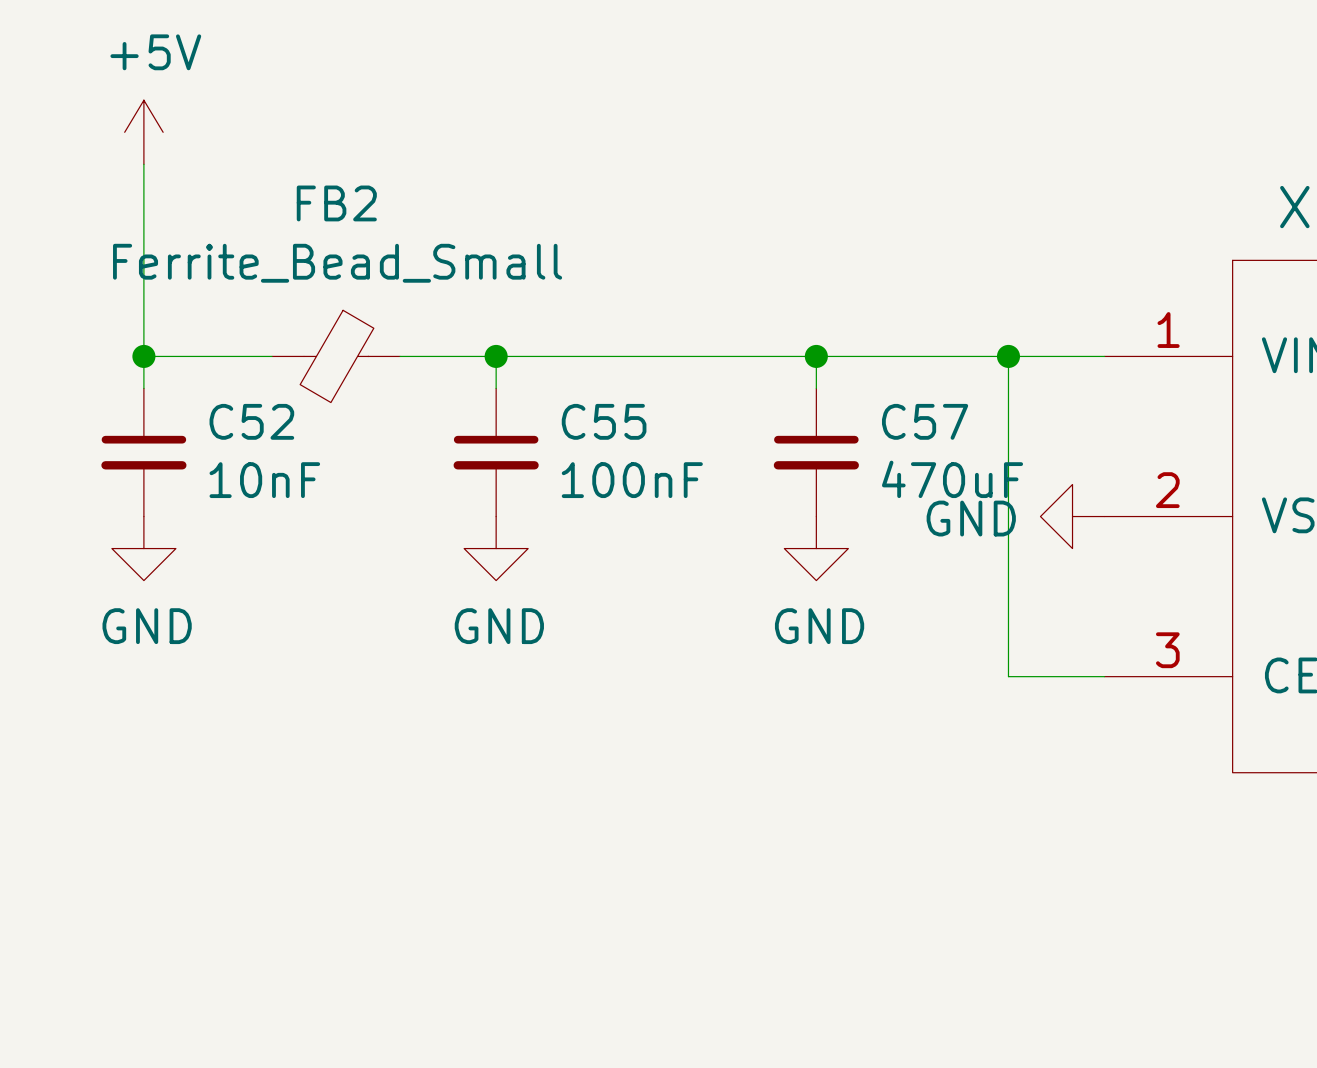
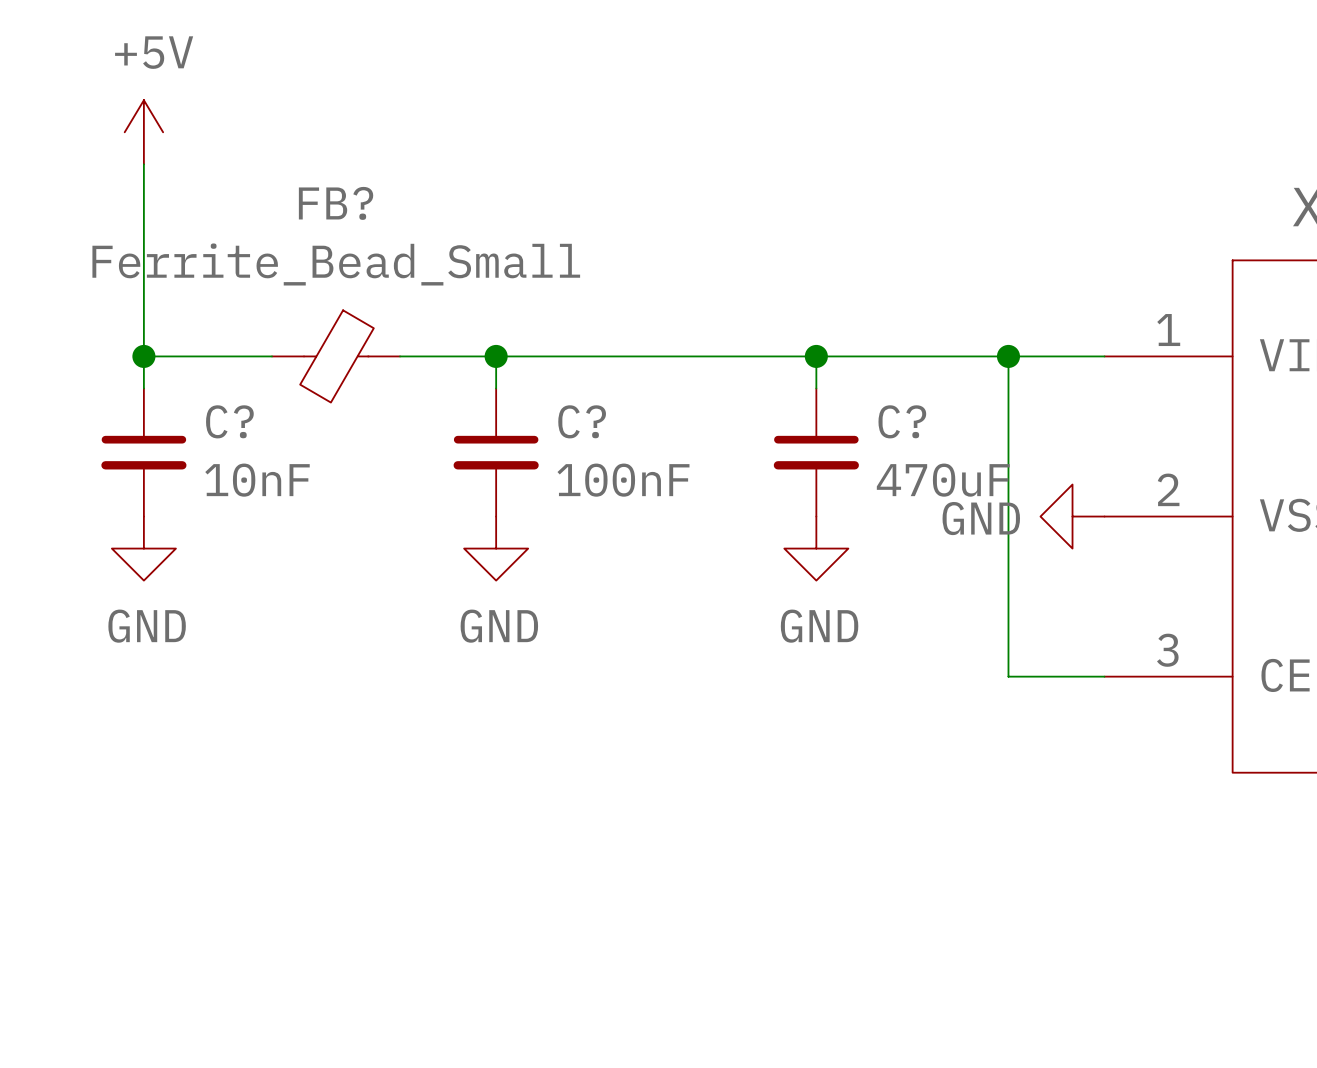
FB2 name: FB2 (336, 203) -> FB? (336, 203)
C52 name: C52 (251, 421) -> C? (229, 421)
C55 name: C55 (604, 421) -> C? (582, 421)
C57 name: C57 (925, 421) -> C? (902, 421)

